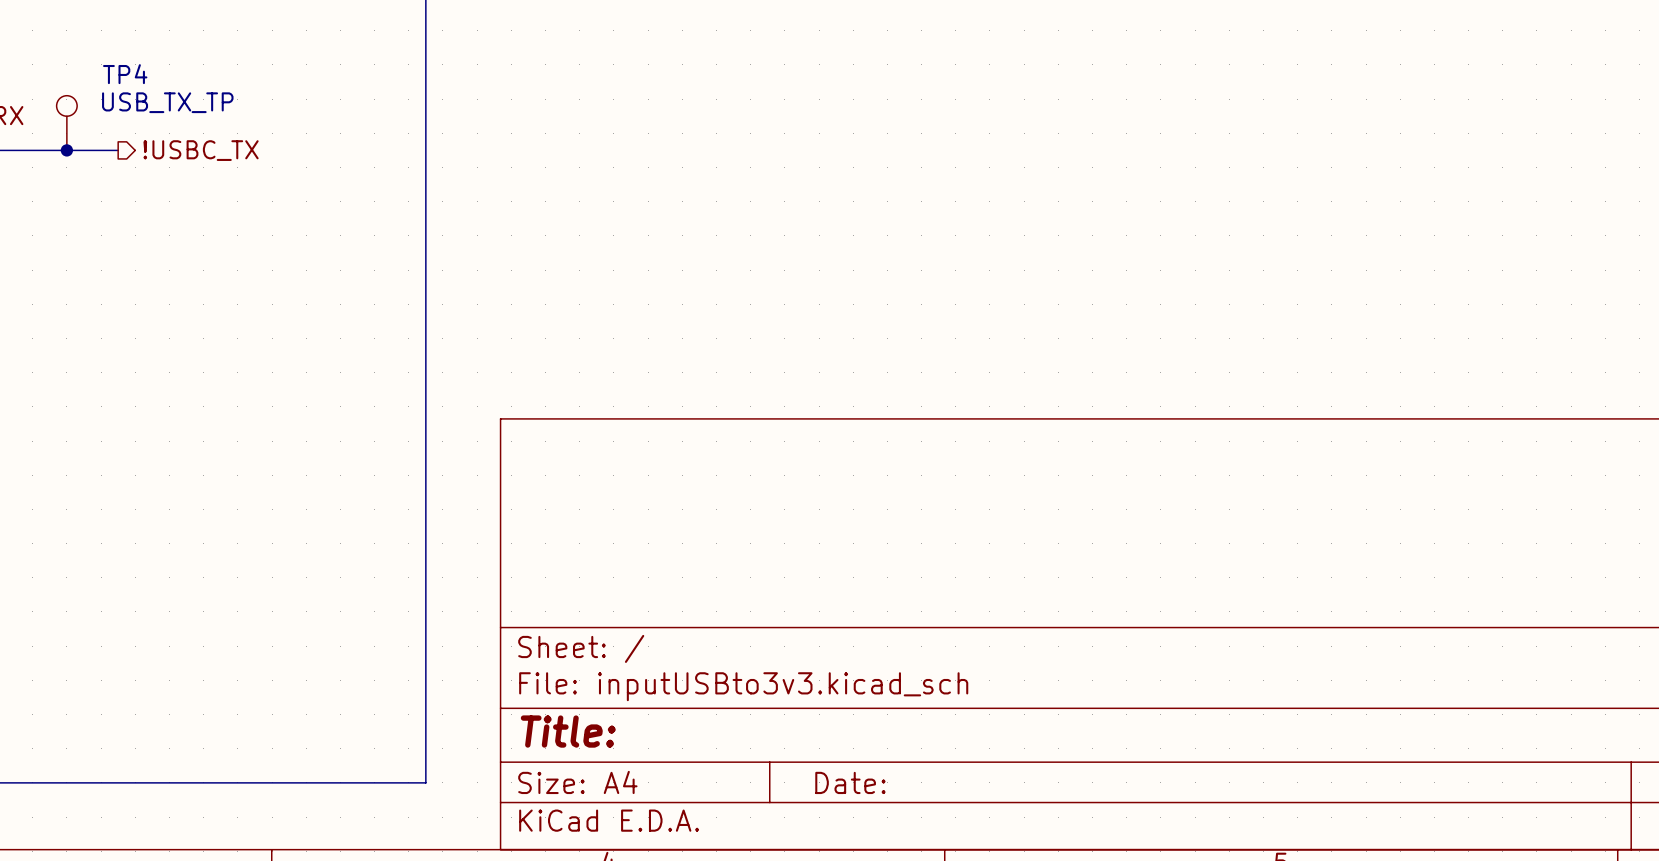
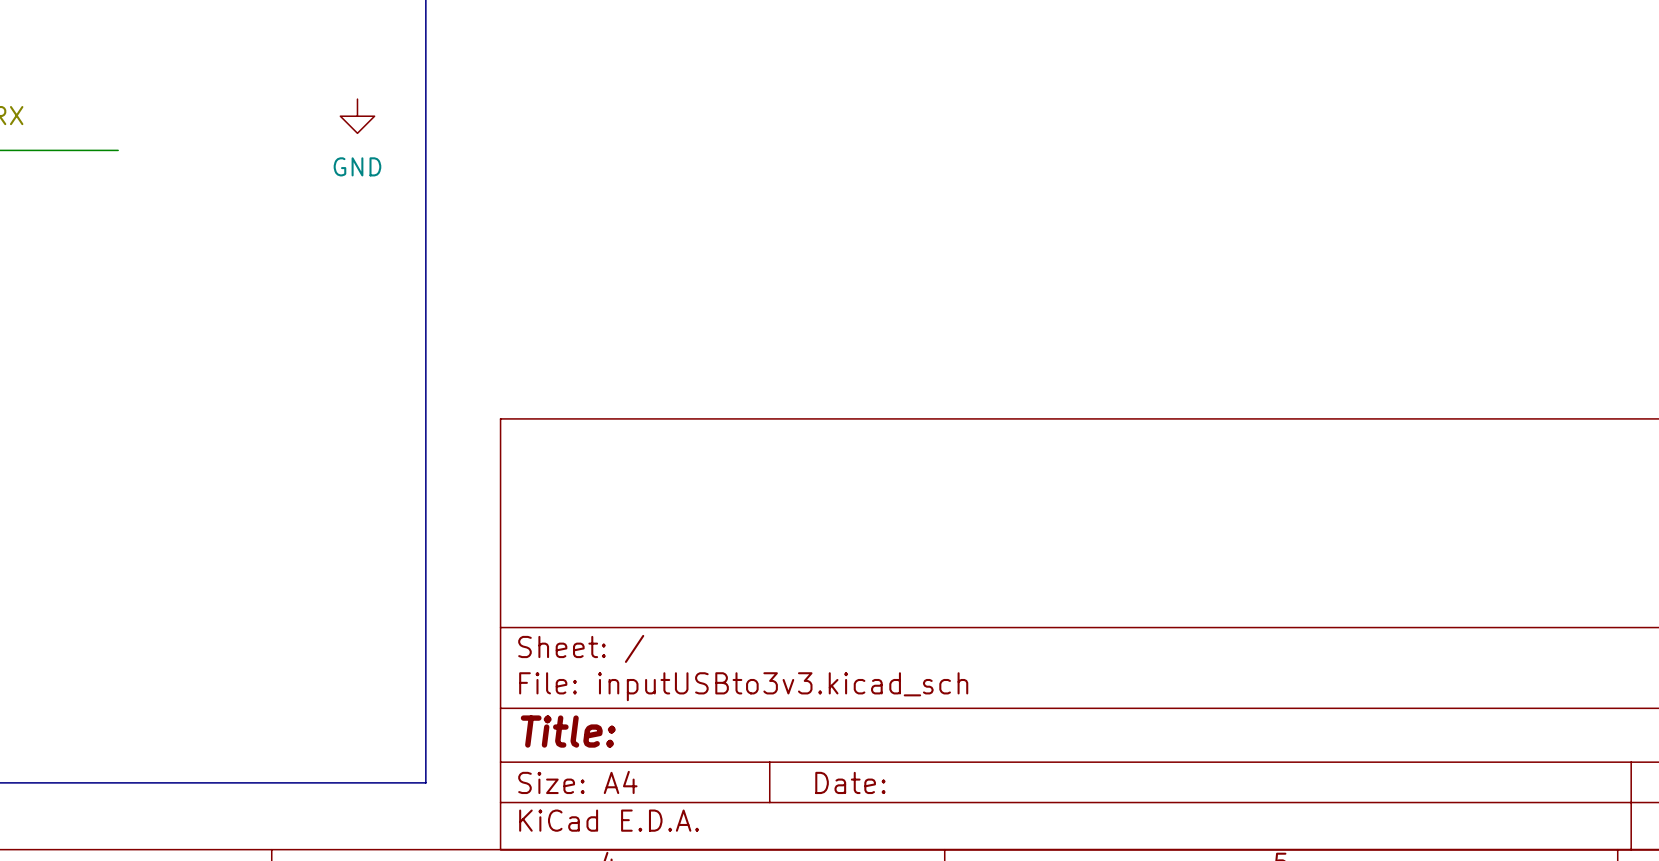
power symbol: none -> GND (357, 116)
TP4: USB_TX_TP (66, 123) -> none
junction: (66, 150) -> none
hierarchical label: !USBC_TX (201, 150) -> none

